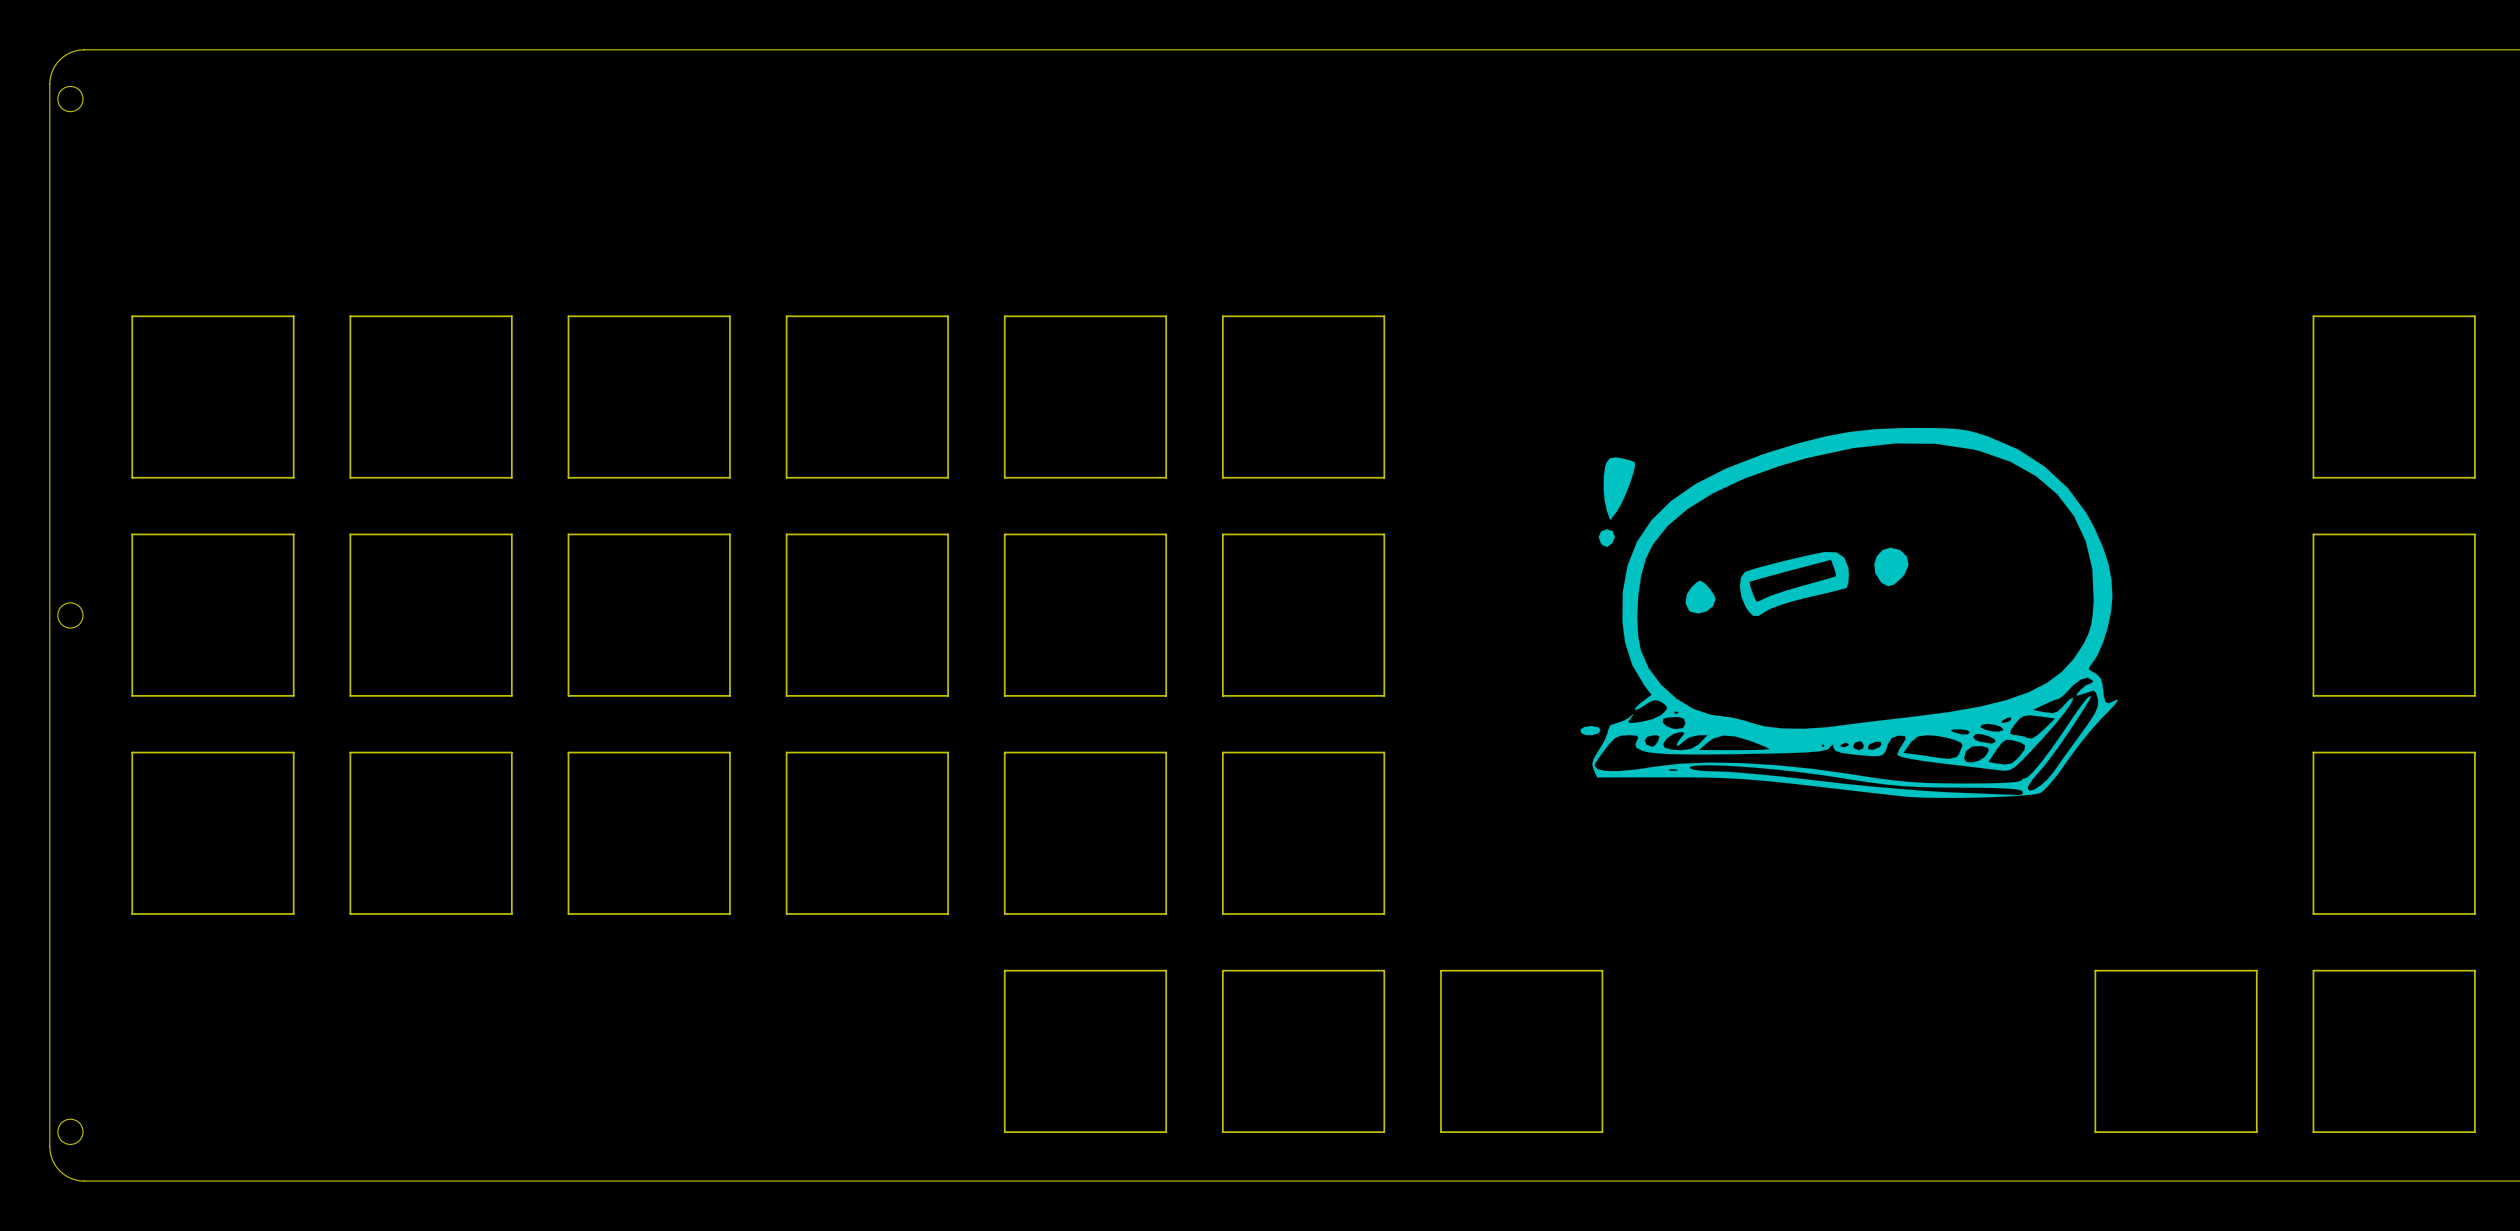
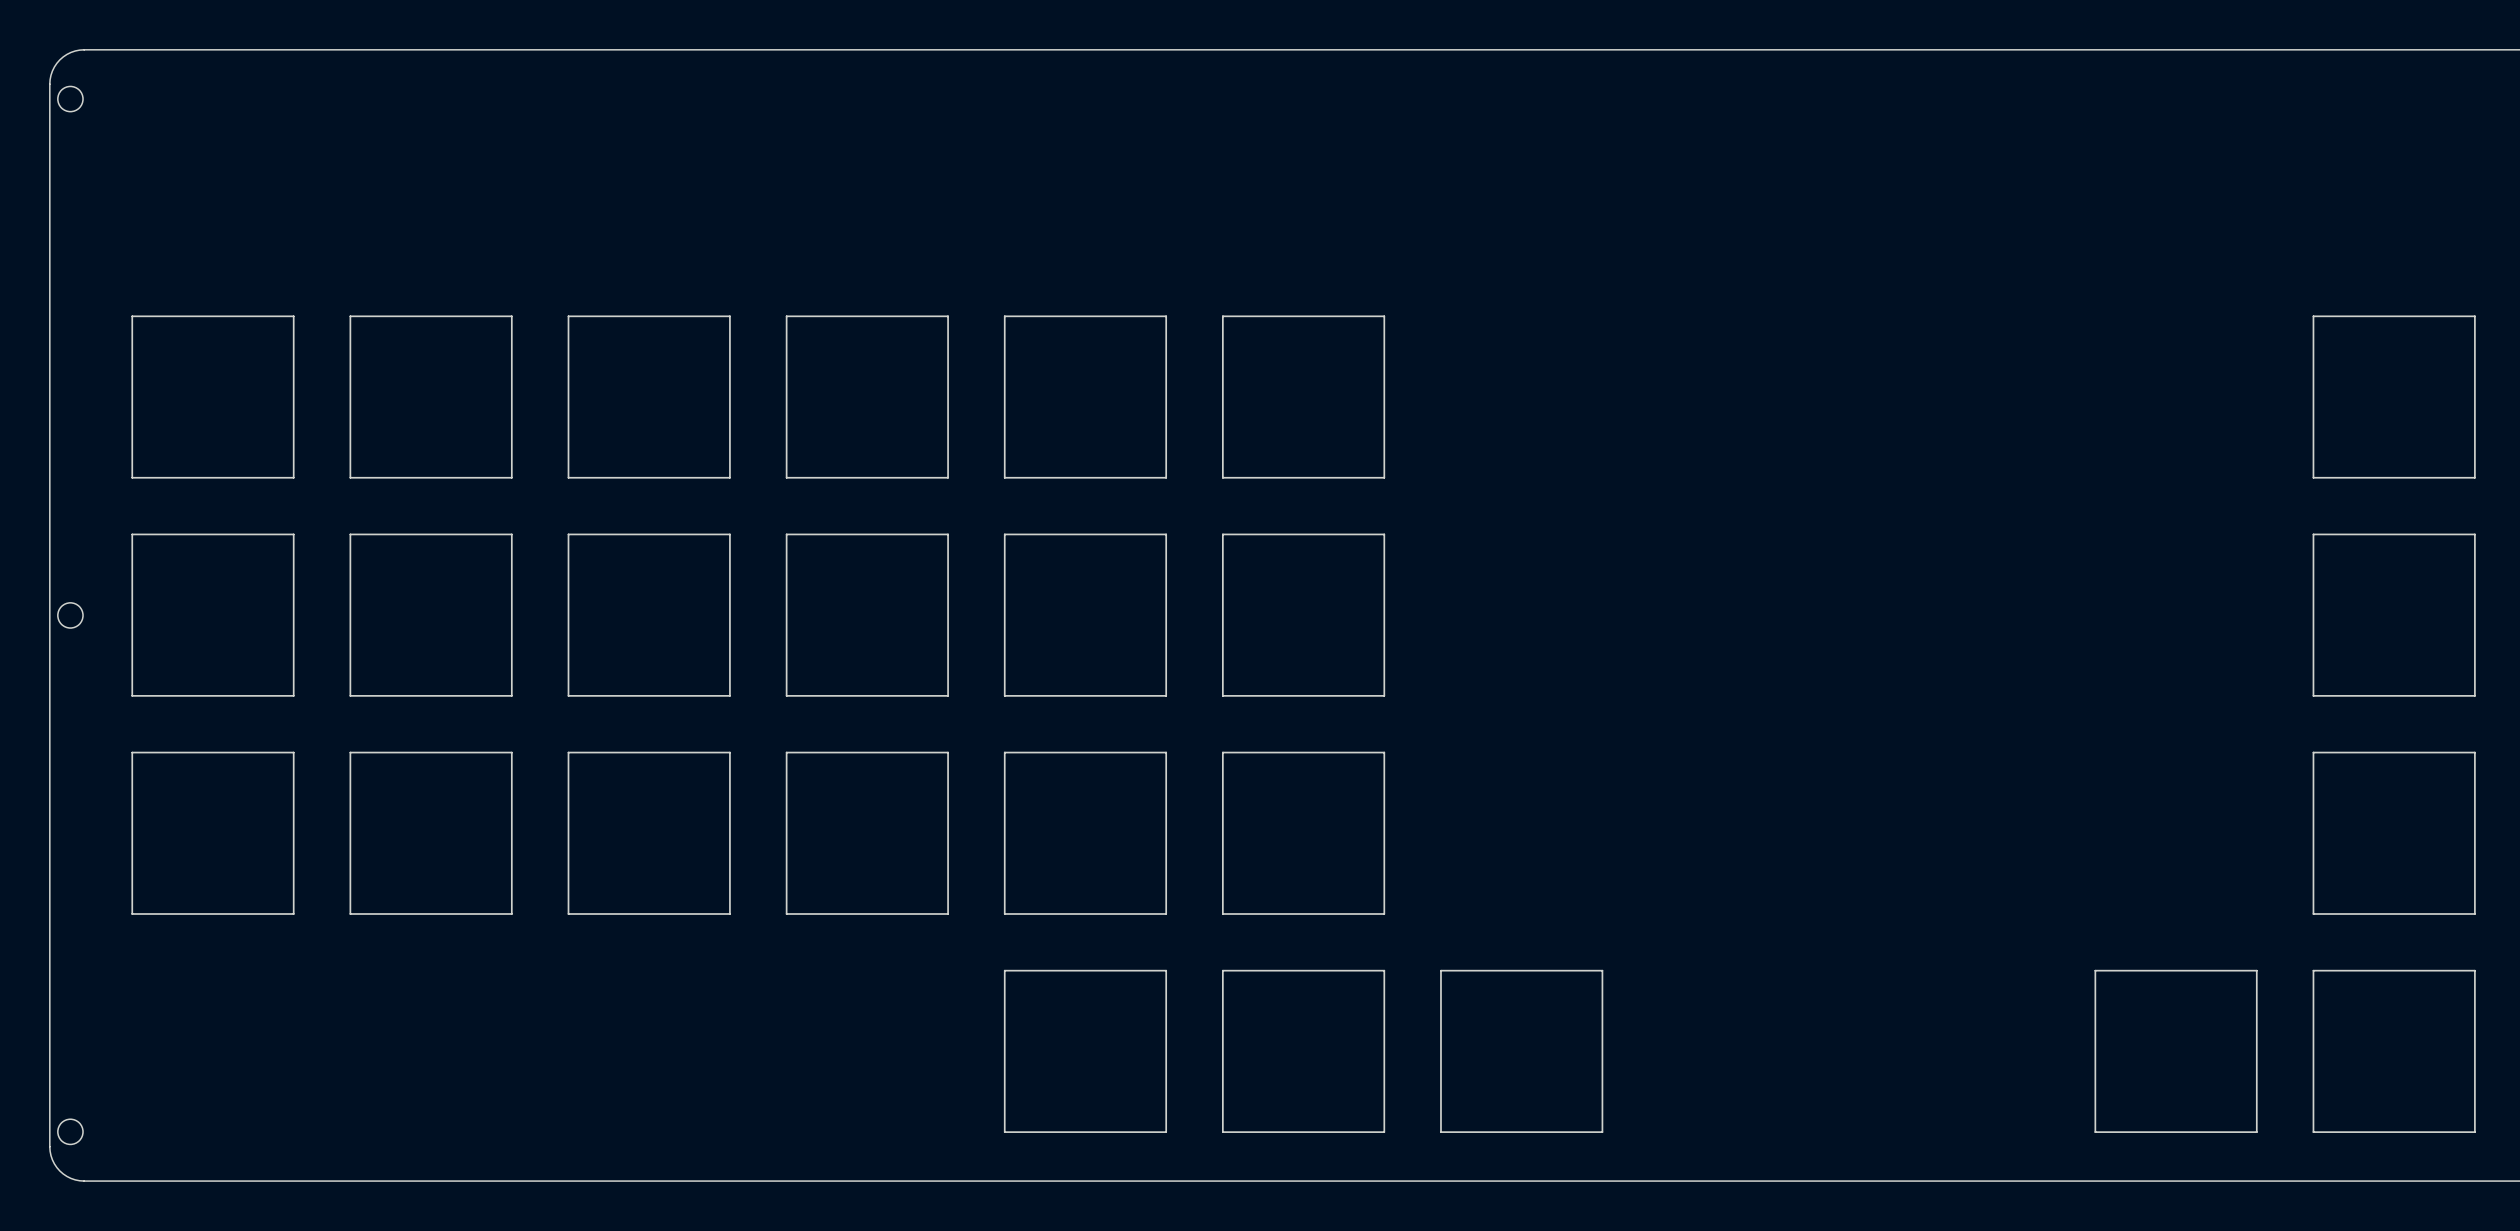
drawing: [1580, 427, 2118, 798] -> none

